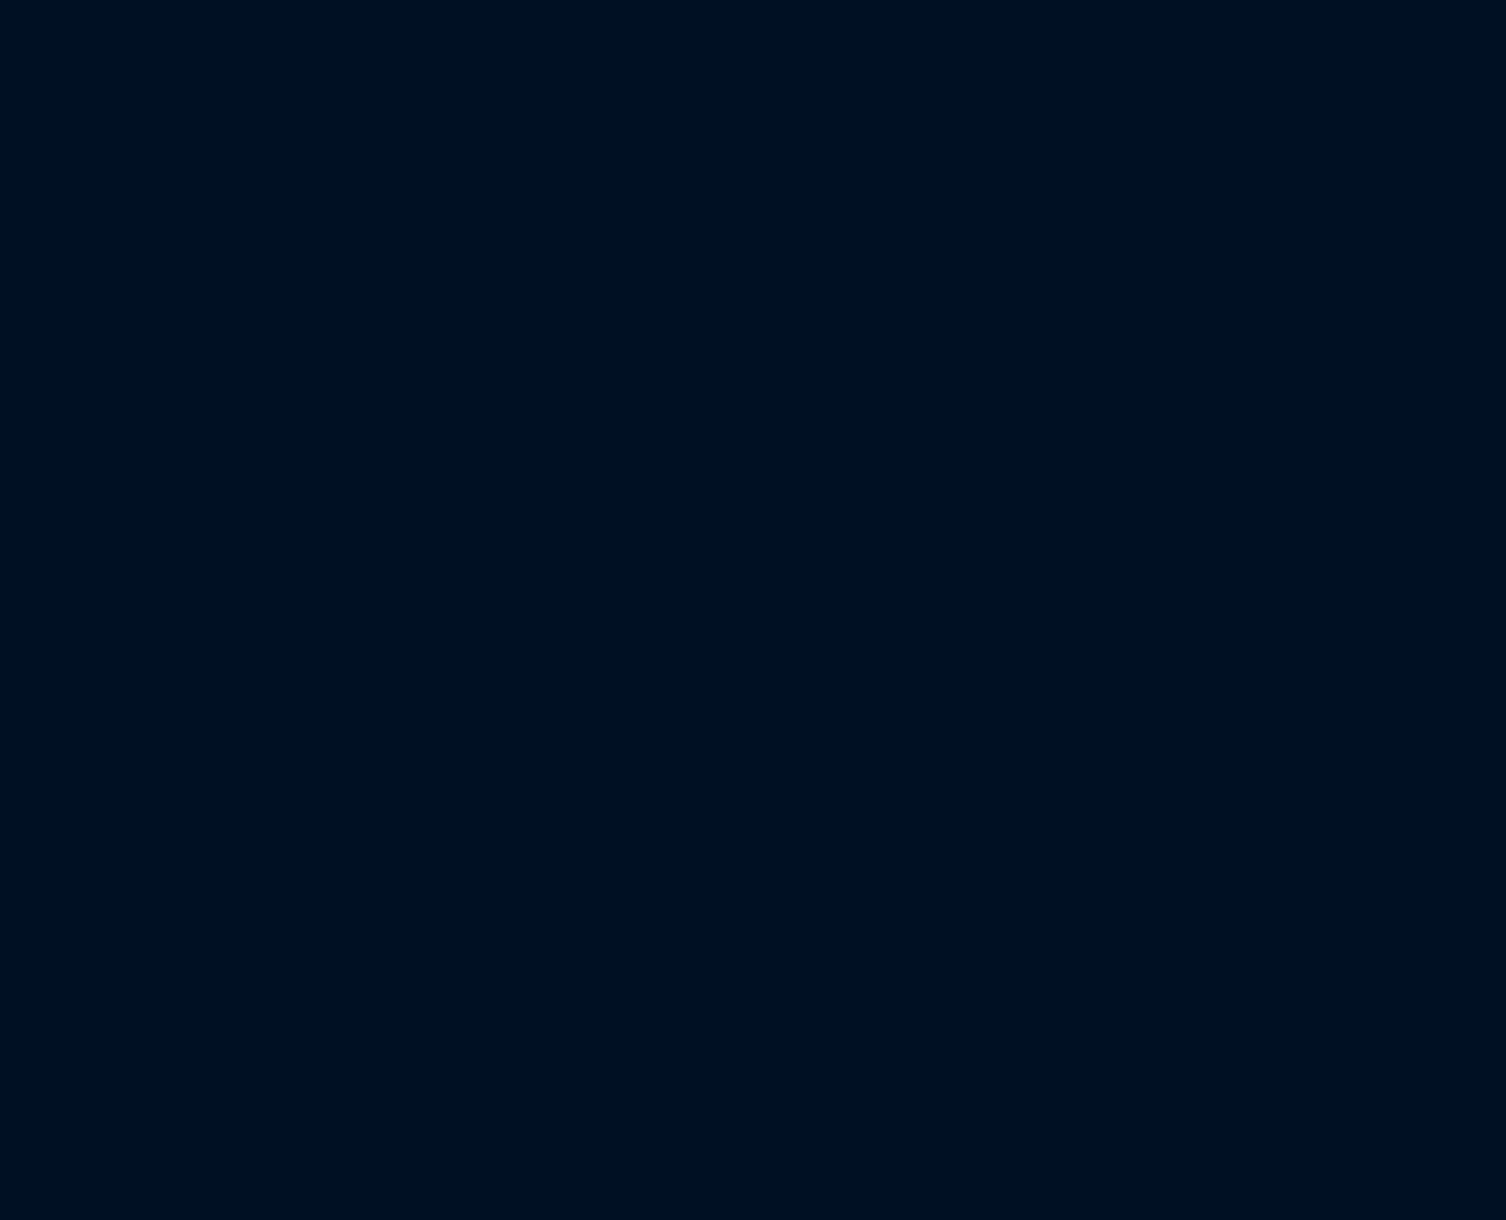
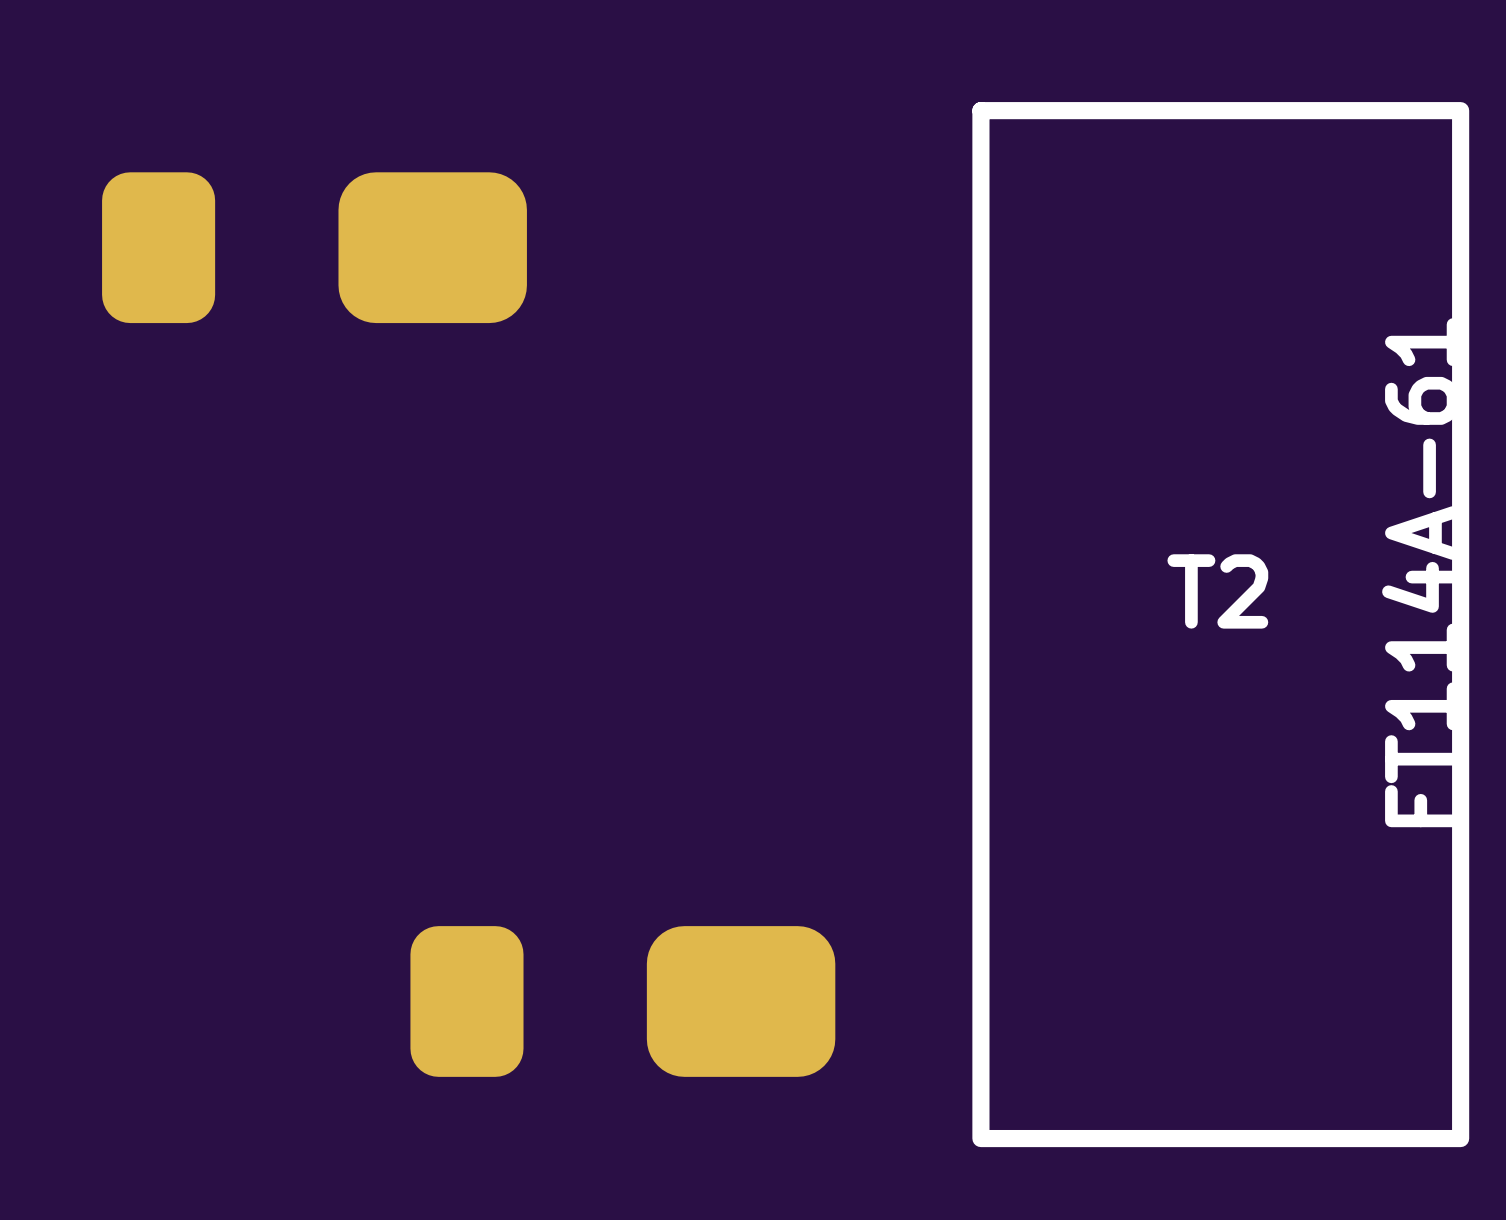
T2: none -> (785, 624)

